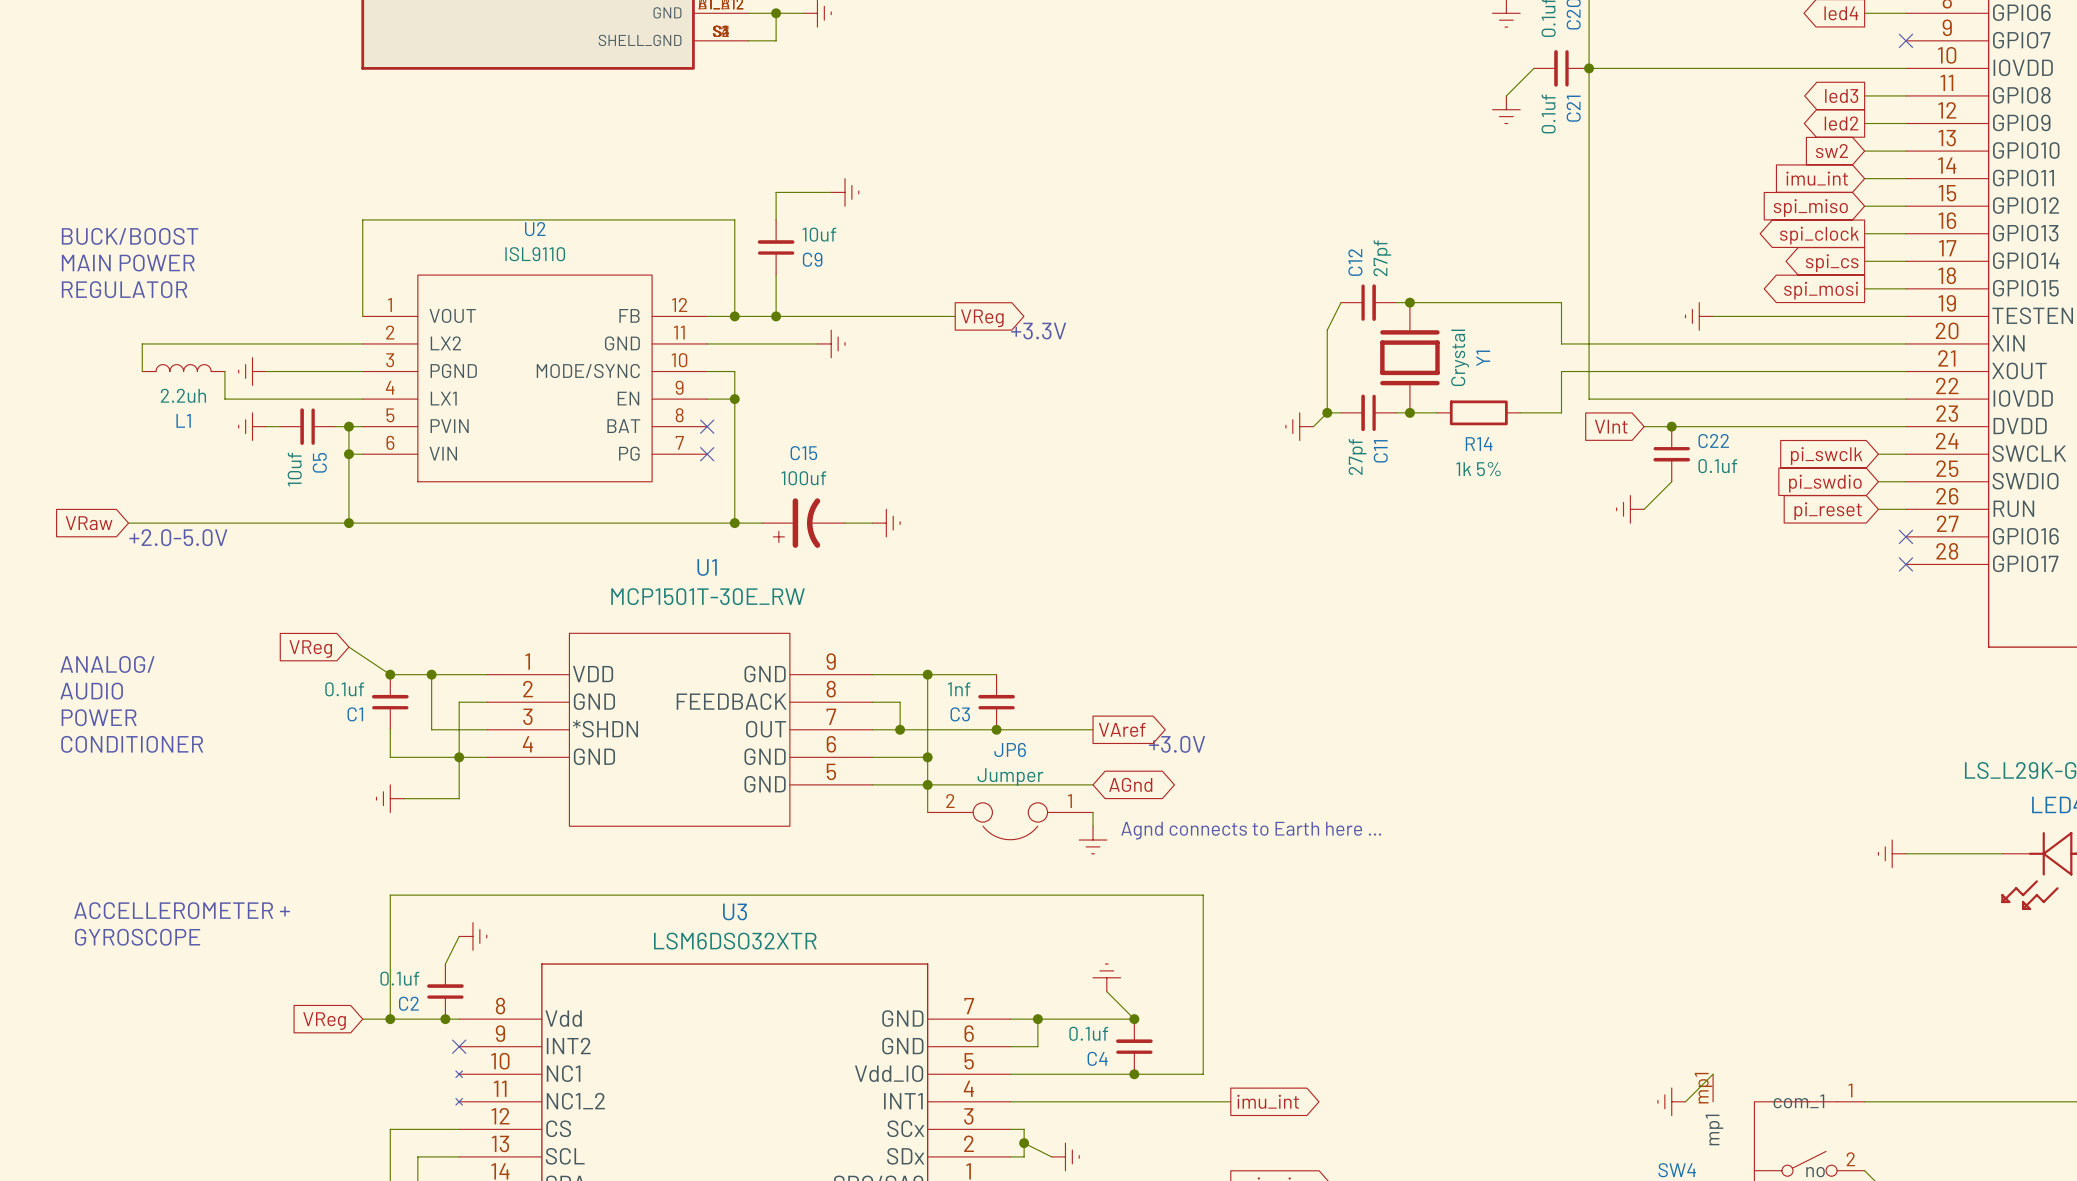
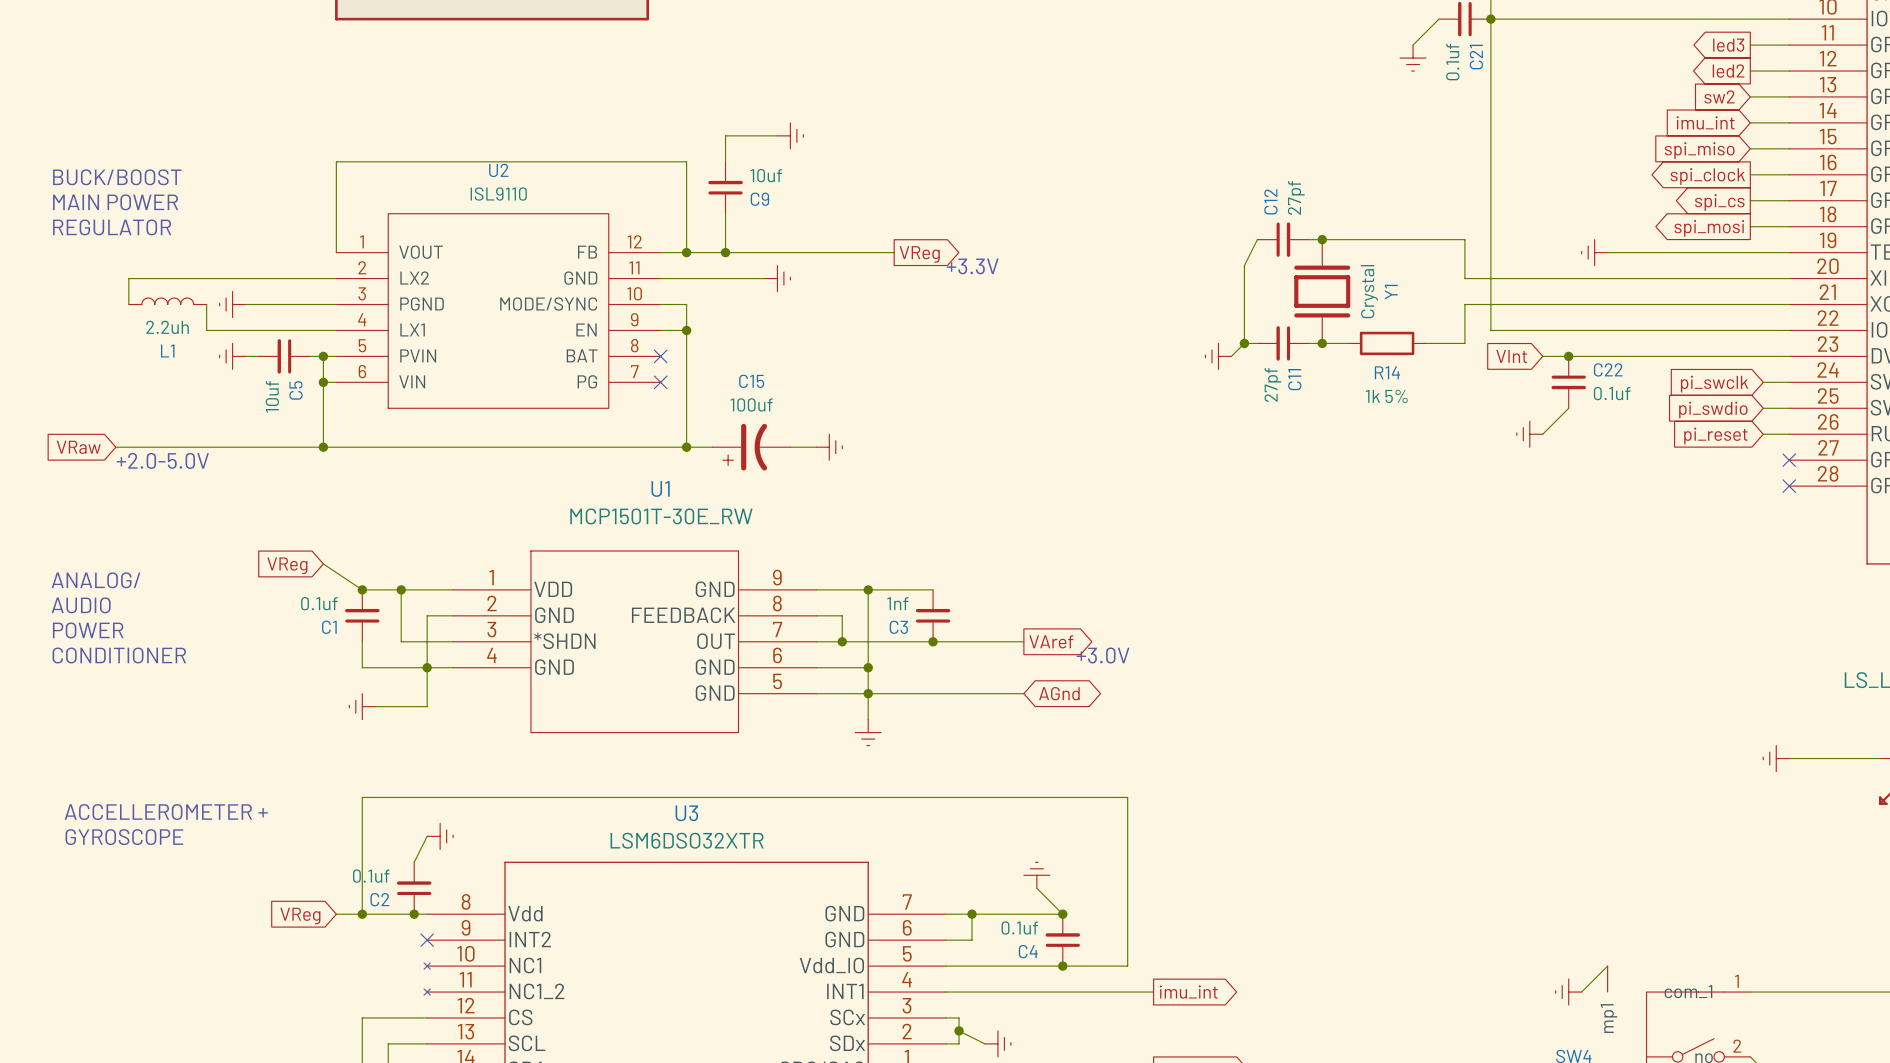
wire: (1093, 812) (1093, 826) -> none
JP6: Jumper (1010, 821) -> none
text: Agnd connects to Earth here … (1251, 830) -> none
power symbol position: (1093, 840) -> (868, 732)
SW4 pin number: mp1 (1703, 1088) -> none

